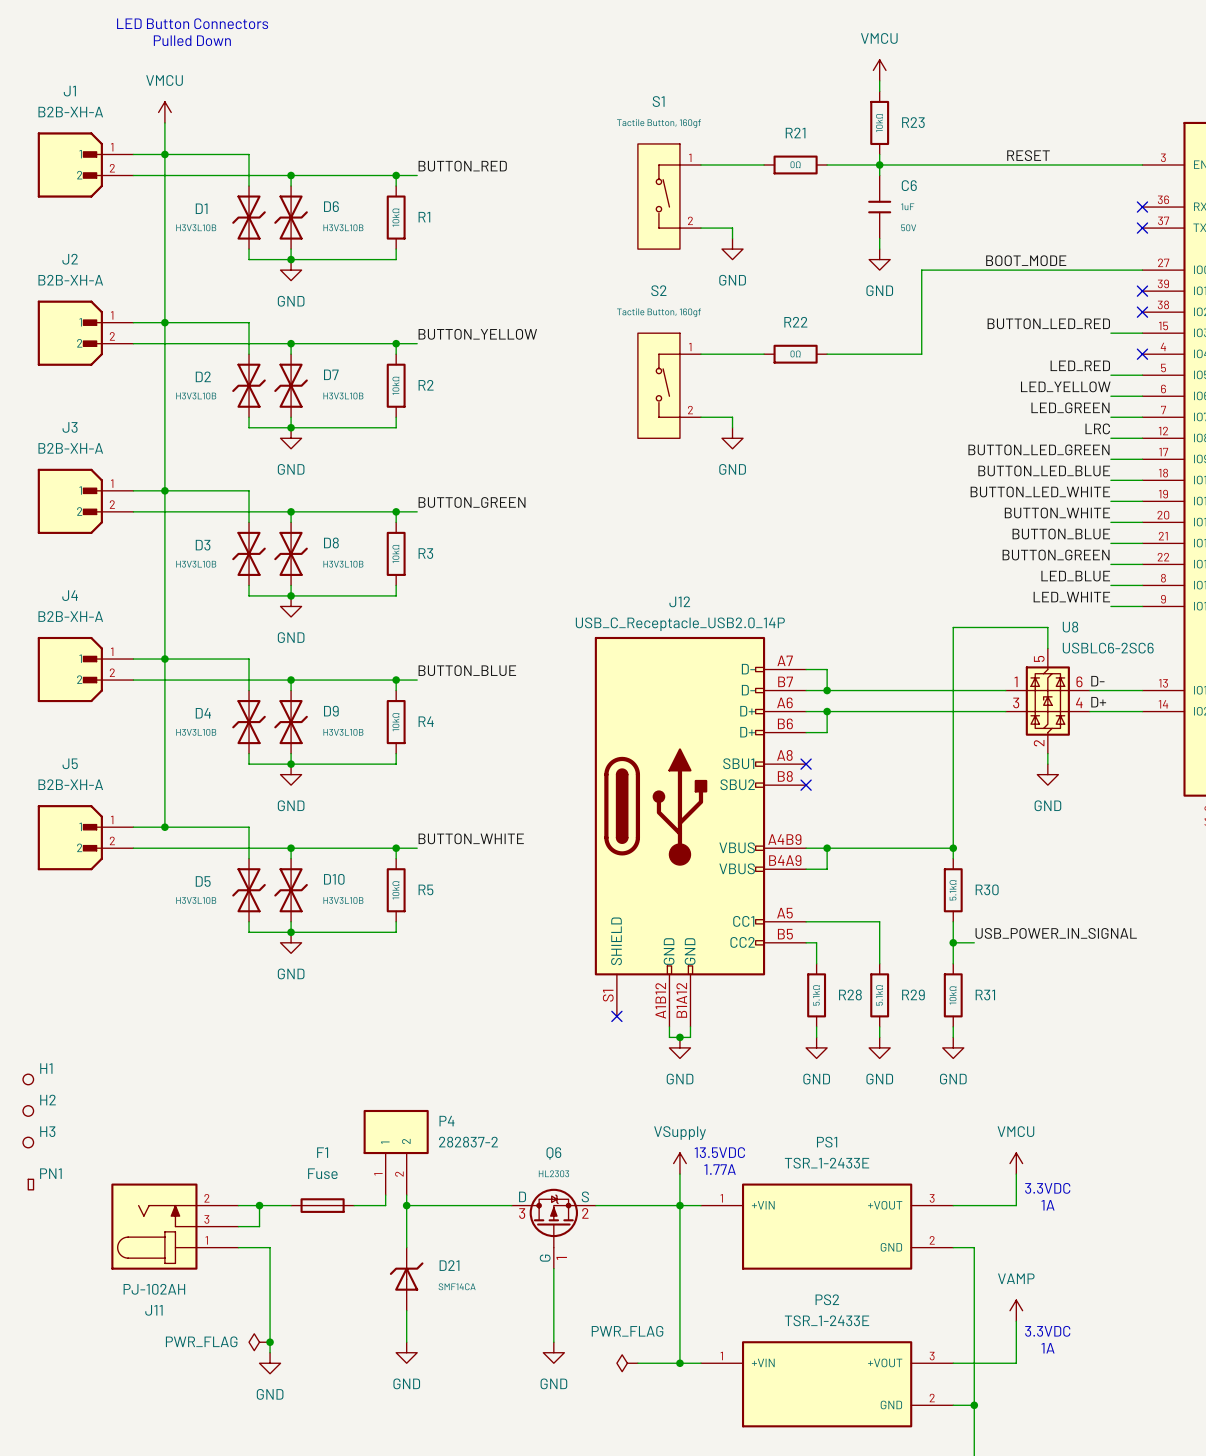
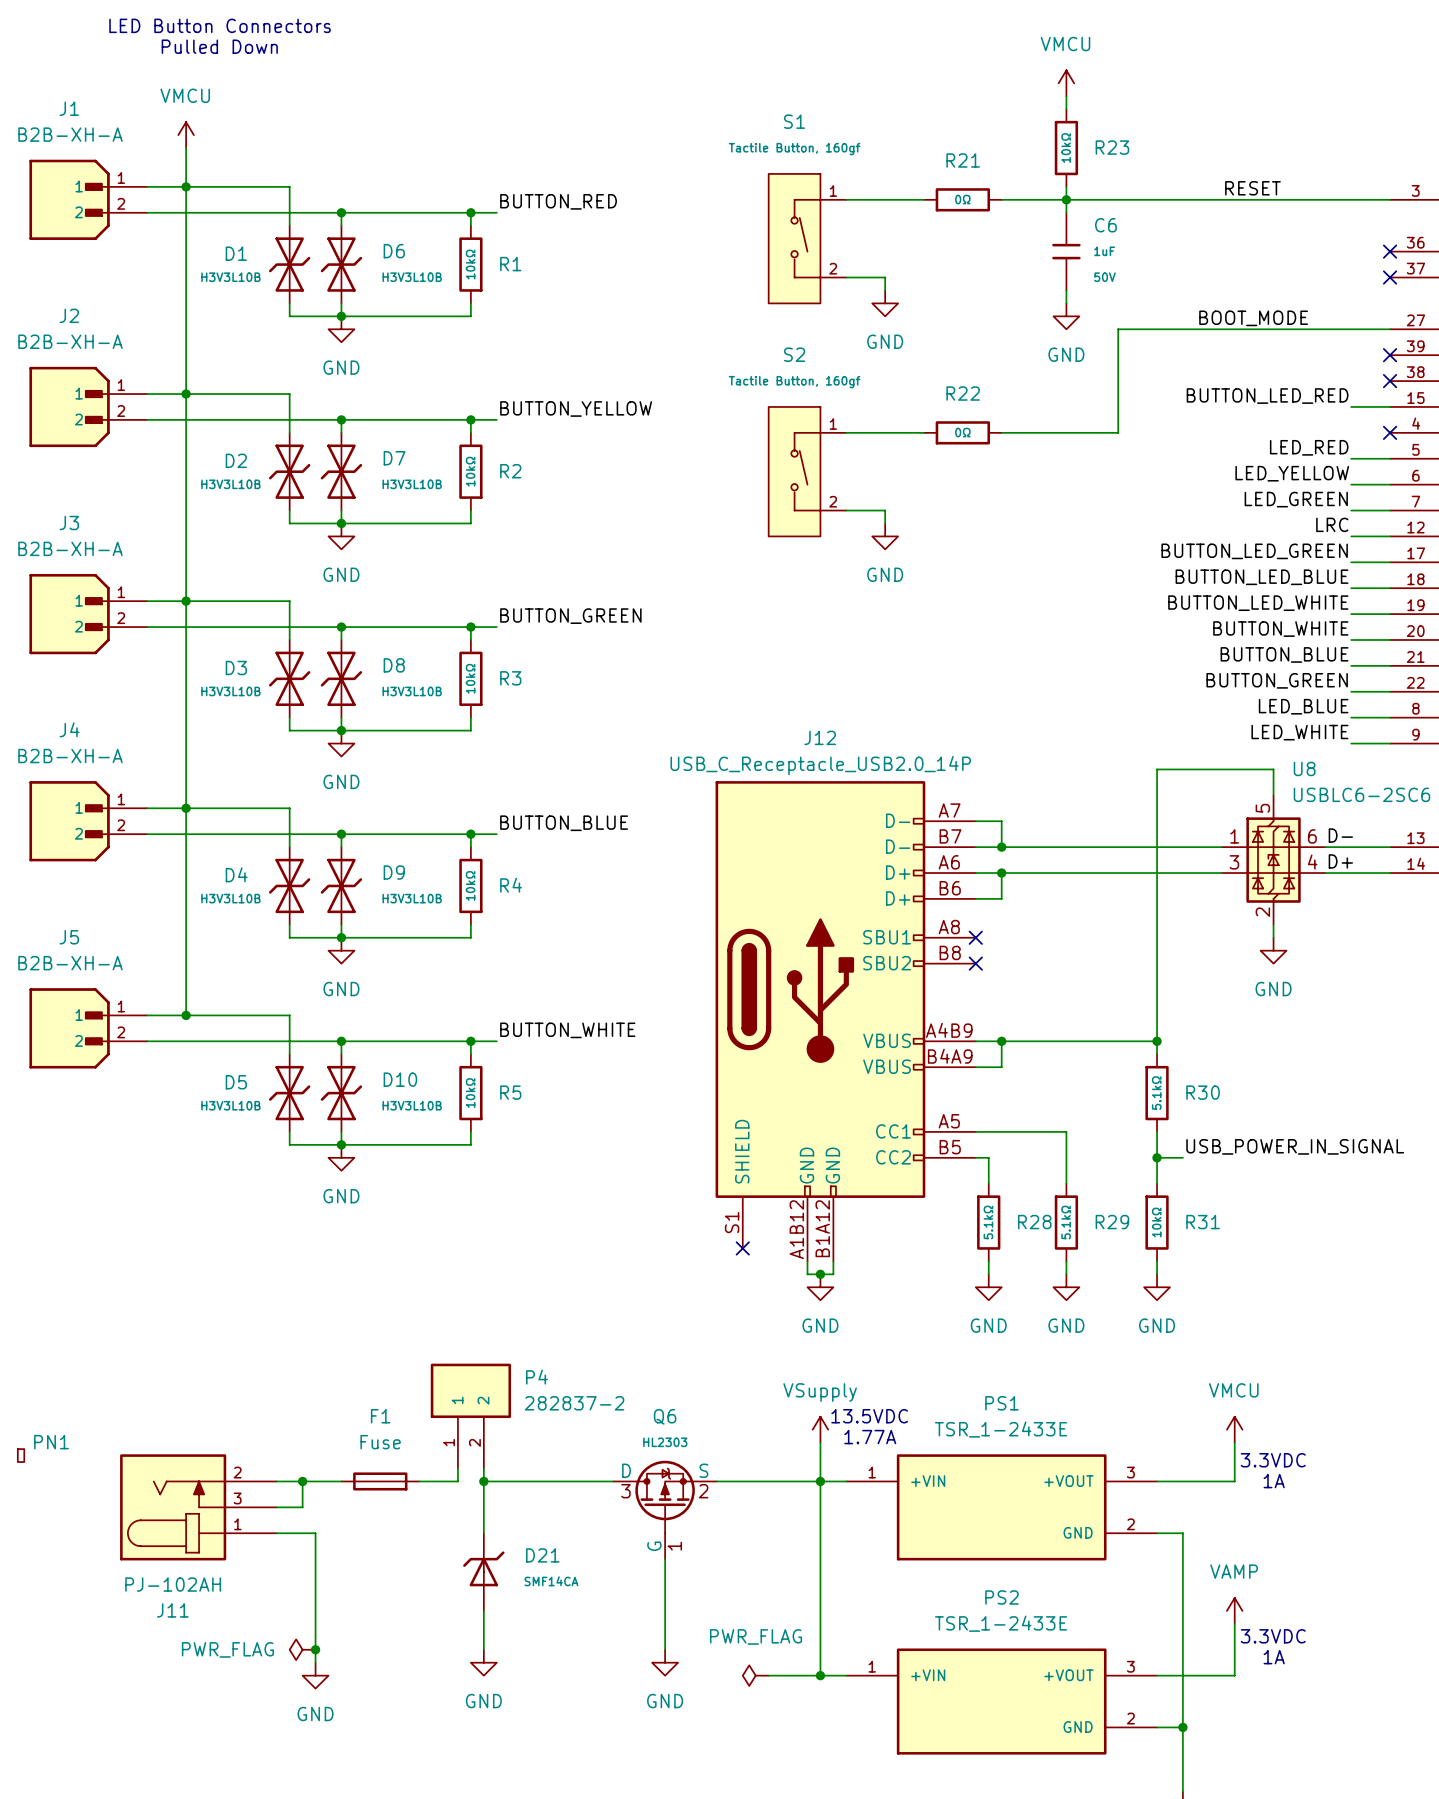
H1: (28, 1079) -> none
H2: (28, 1110) -> none
H3: (28, 1142) -> none

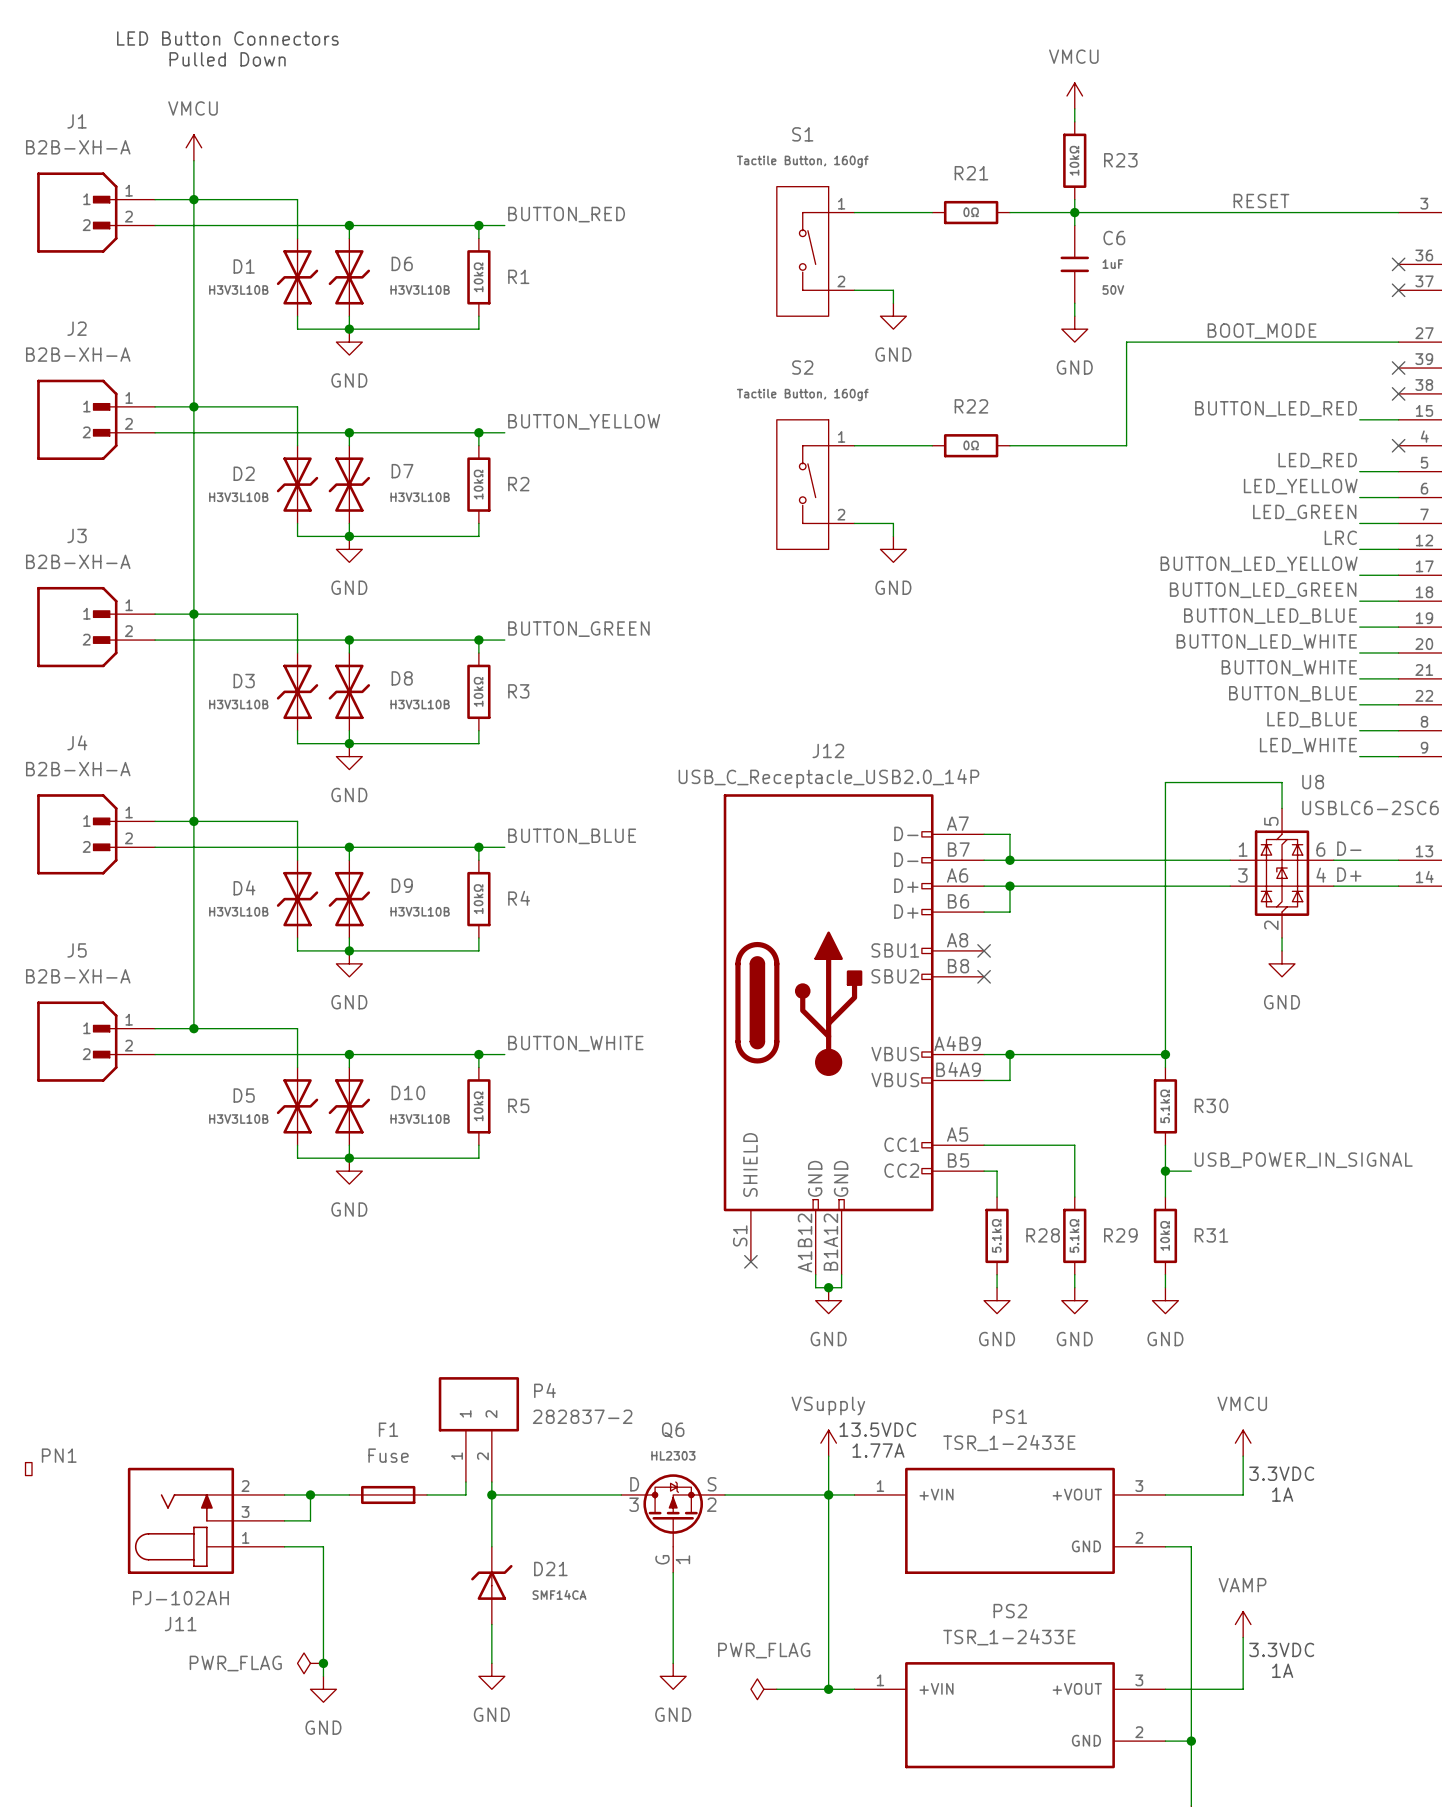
label: BUTTON_LED_GREEN (1254, 551) -> BUTTON_LED_YELLOW (1259, 564)
label: BUTTON_LED_BLUE (1262, 577) -> BUTTON_LED_GREEN (1263, 590)
label: BUTTON_LED_WHITE (1258, 603) -> BUTTON_LED_BLUE (1270, 616)
label: BUTTON_WHITE (1280, 629) -> BUTTON_LED_WHITE (1266, 642)
label: BUTTON_BLUE (1284, 654) -> BUTTON_WHITE (1289, 667)
label: BUTTON_GREEN (1277, 680) -> BUTTON_BLUE (1293, 693)

